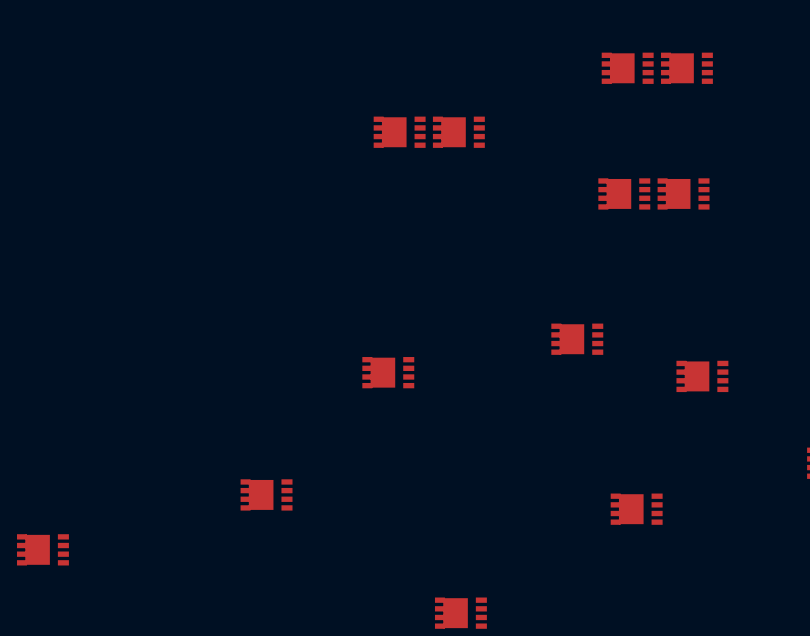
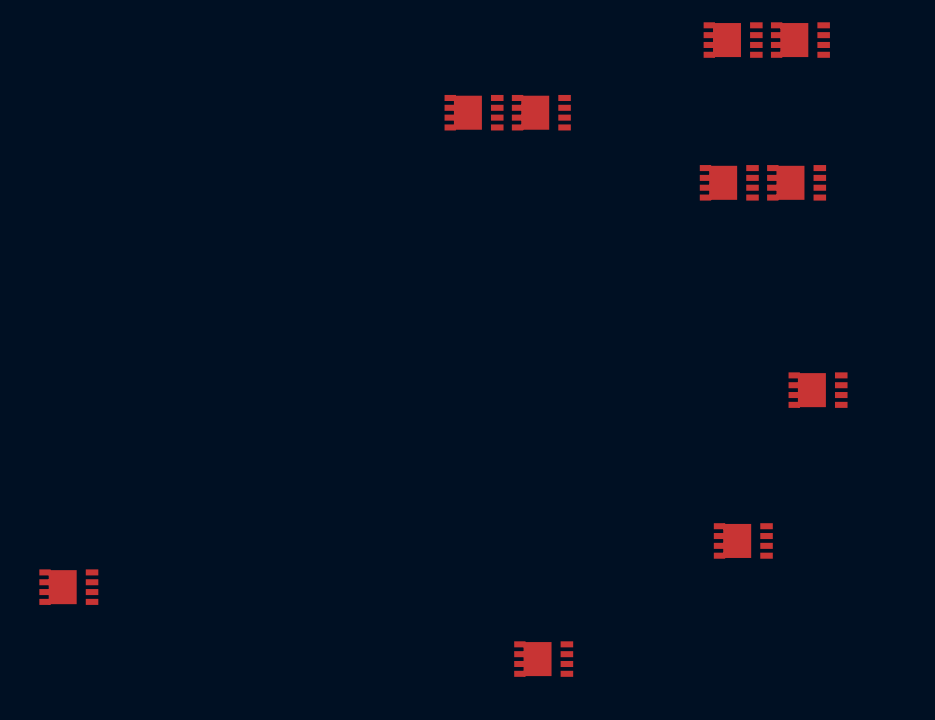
part: (577, 339) -> none
part: (388, 372) -> none
part: (266, 494) -> none

